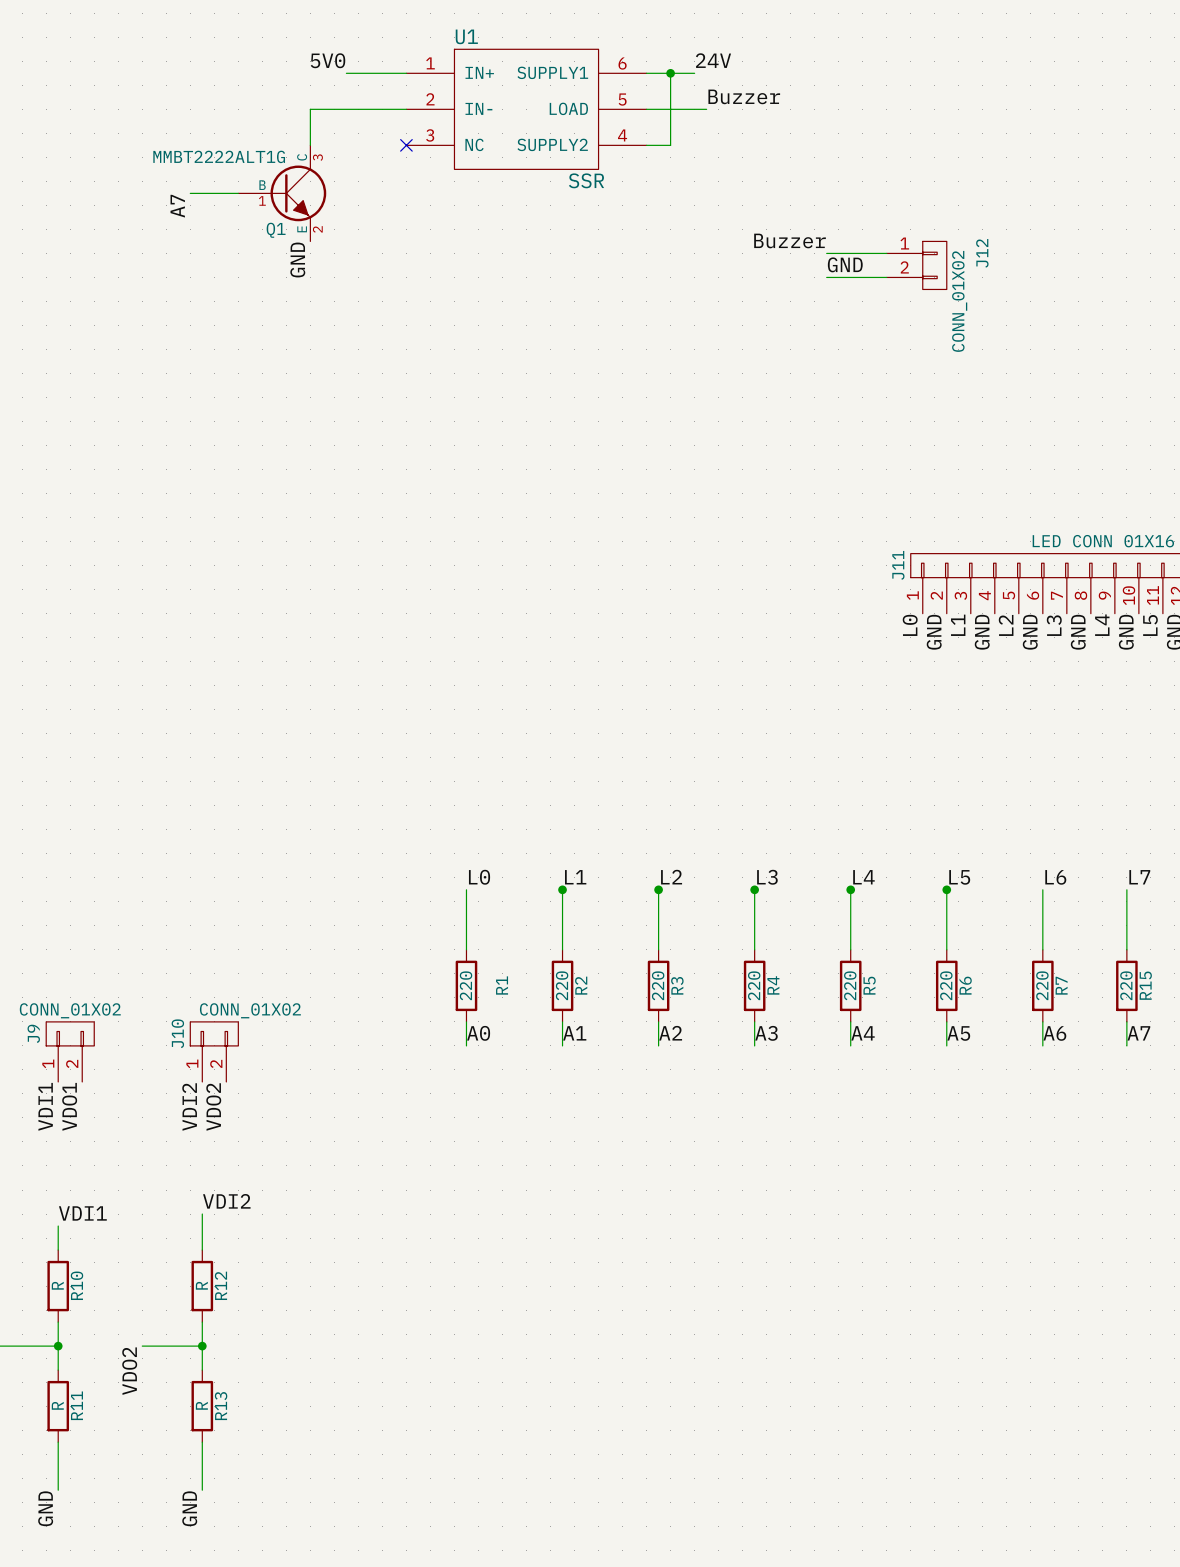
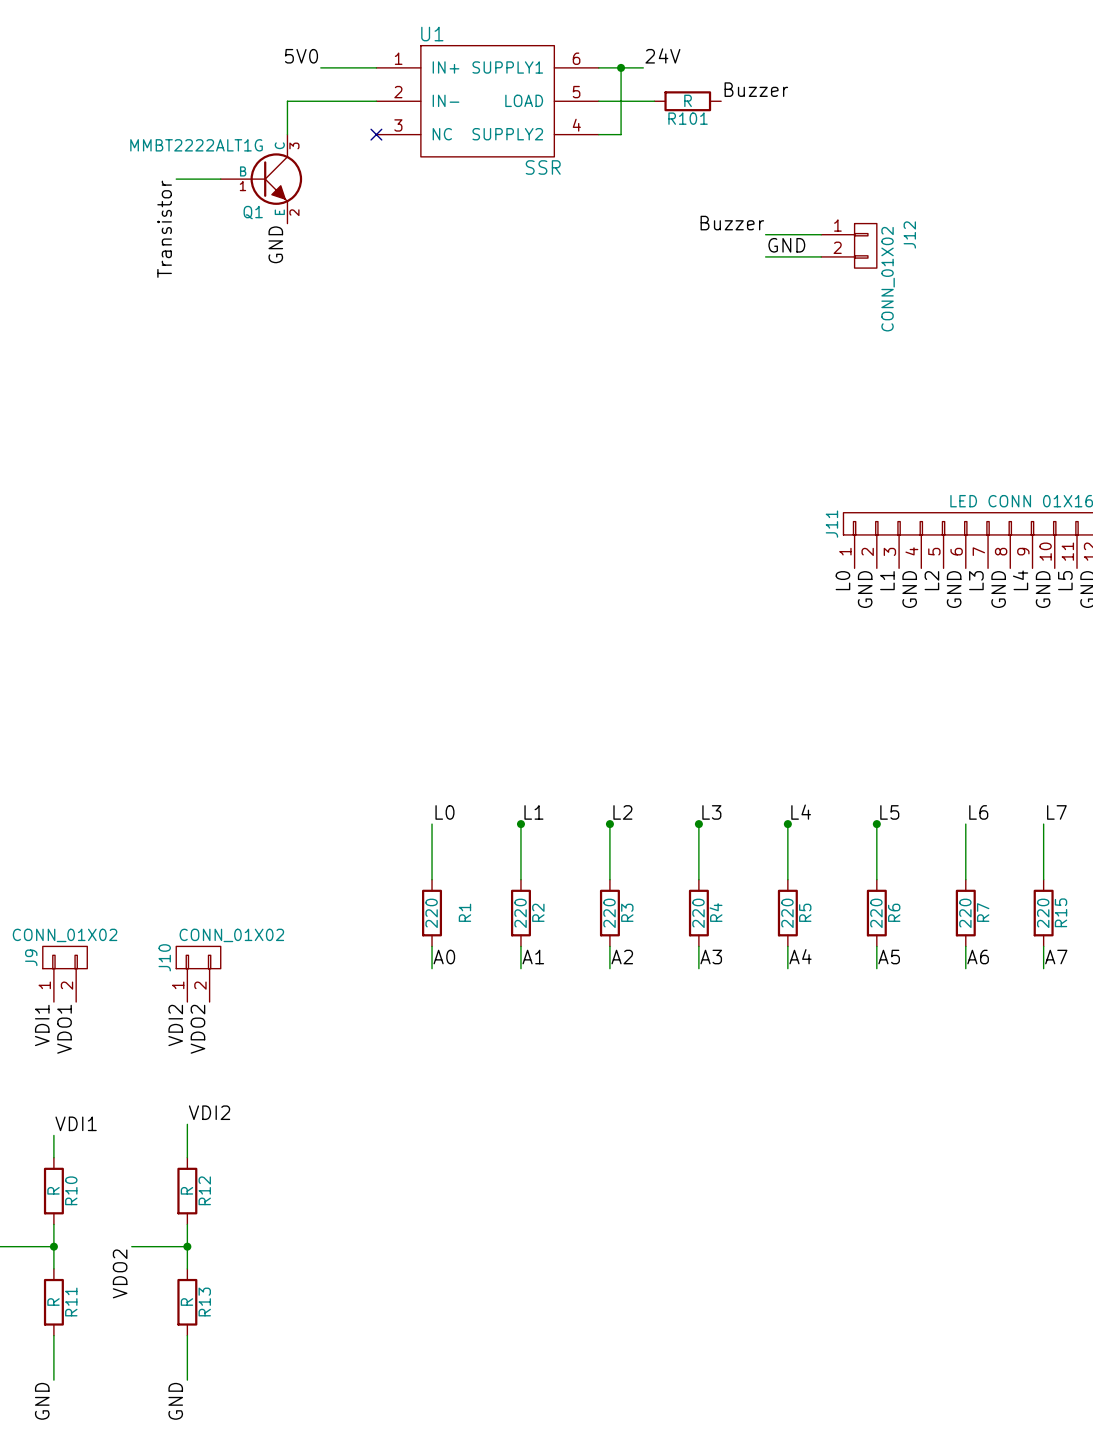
label position: Buzzer (744, 96) -> Buzzer (756, 89)
R101: none -> R (687, 101)
label: A7 (177, 206) -> Transistor (164, 229)

